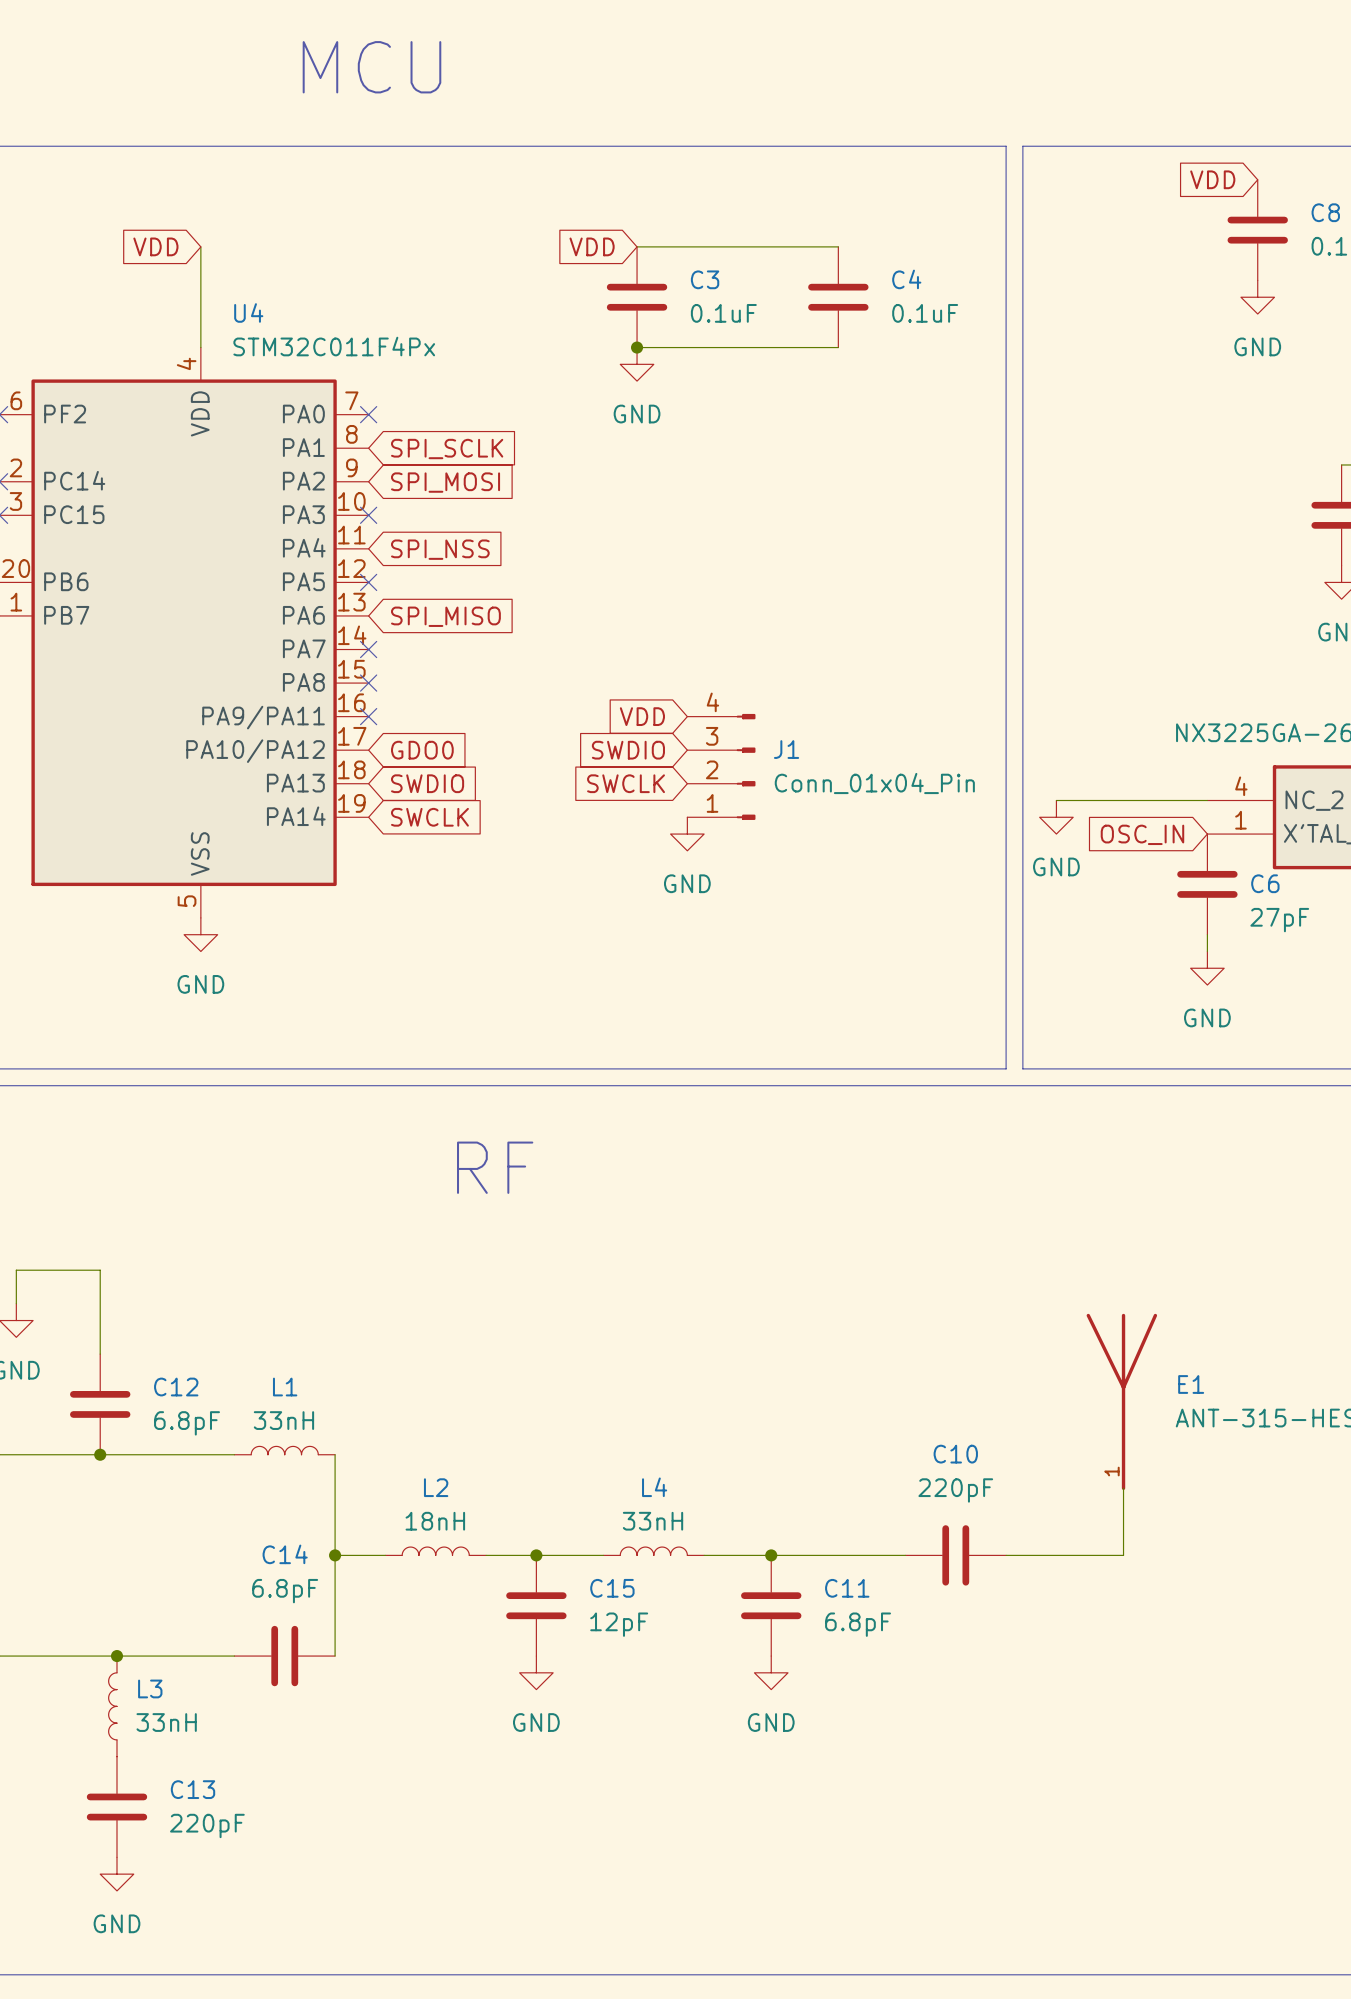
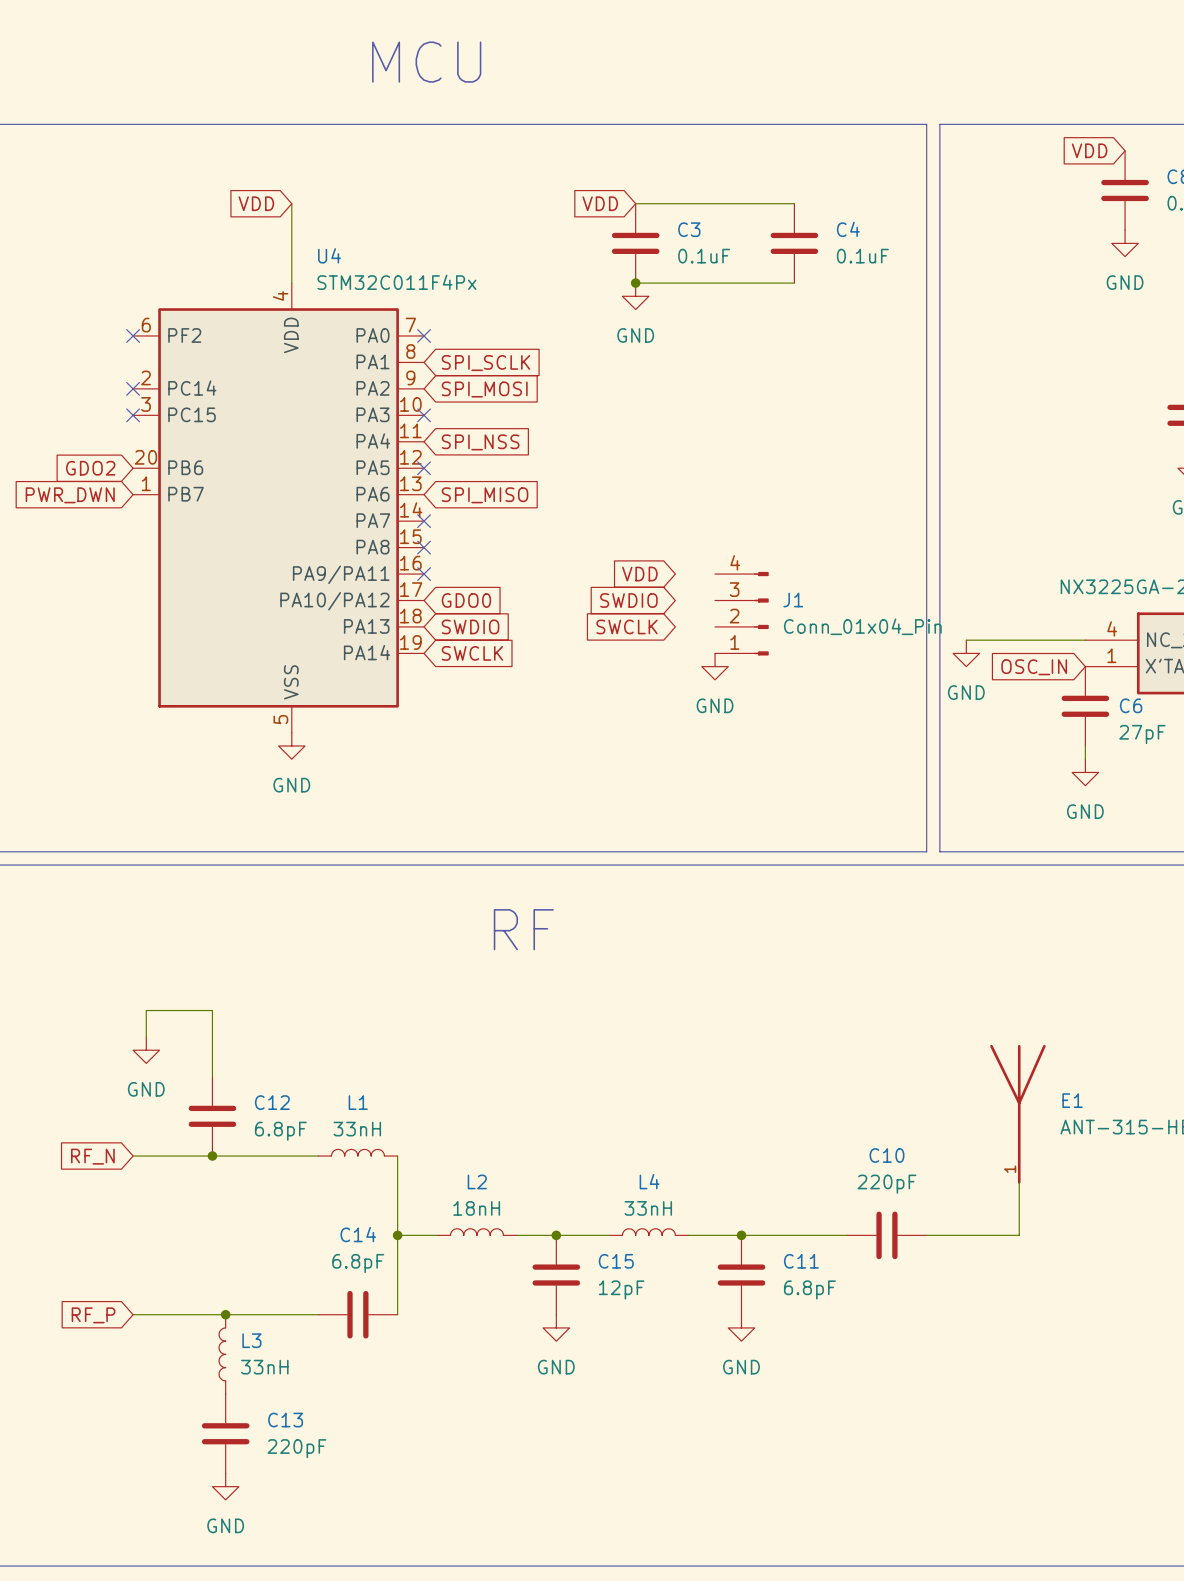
J1 position: (721, 766) -> (741, 613)
power symbol position: GND (687, 834) -> GND (715, 666)

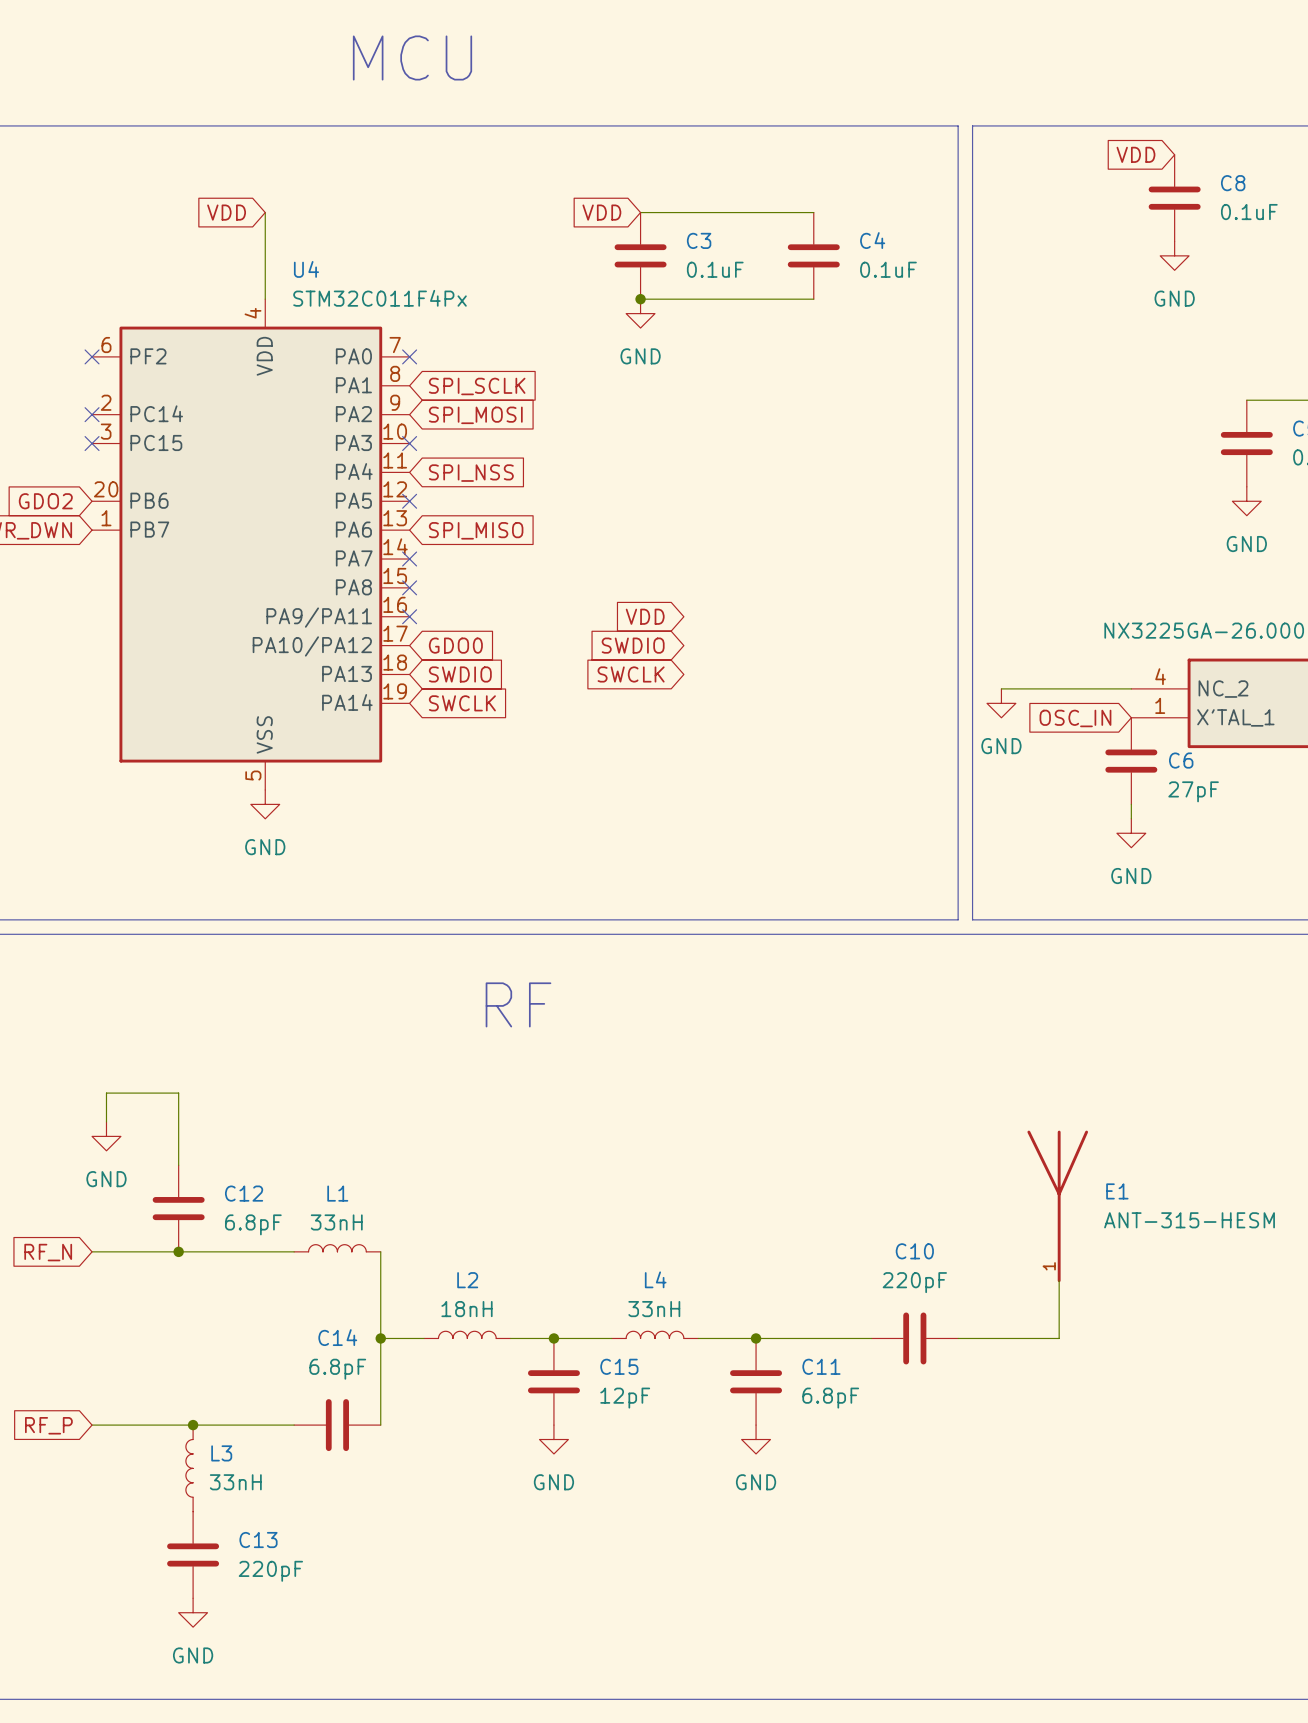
J1: Conn_01x04_Pin (741, 613) -> none
power symbol: GND (715, 666) -> none

